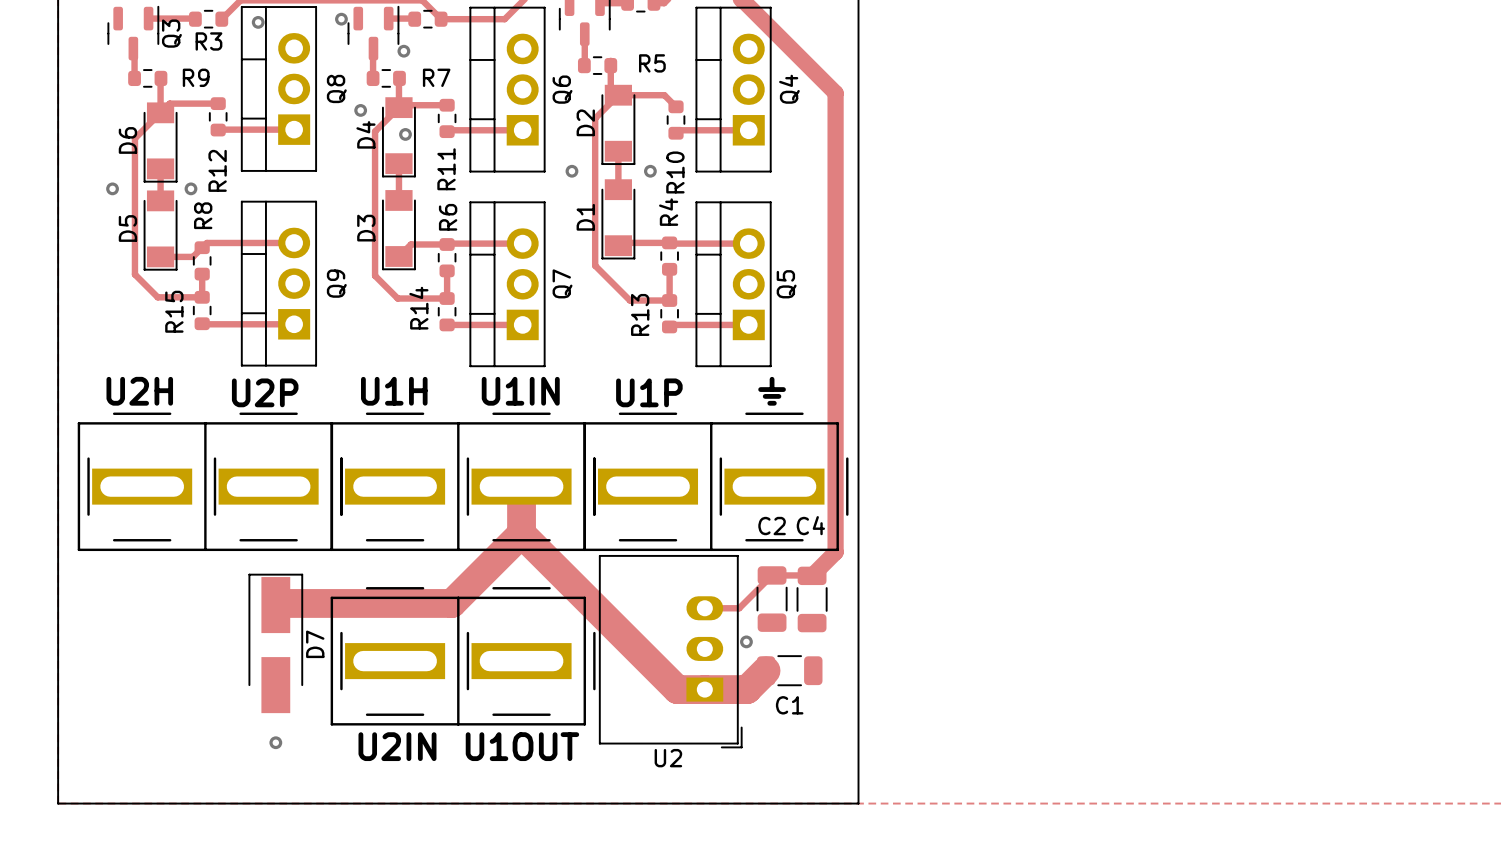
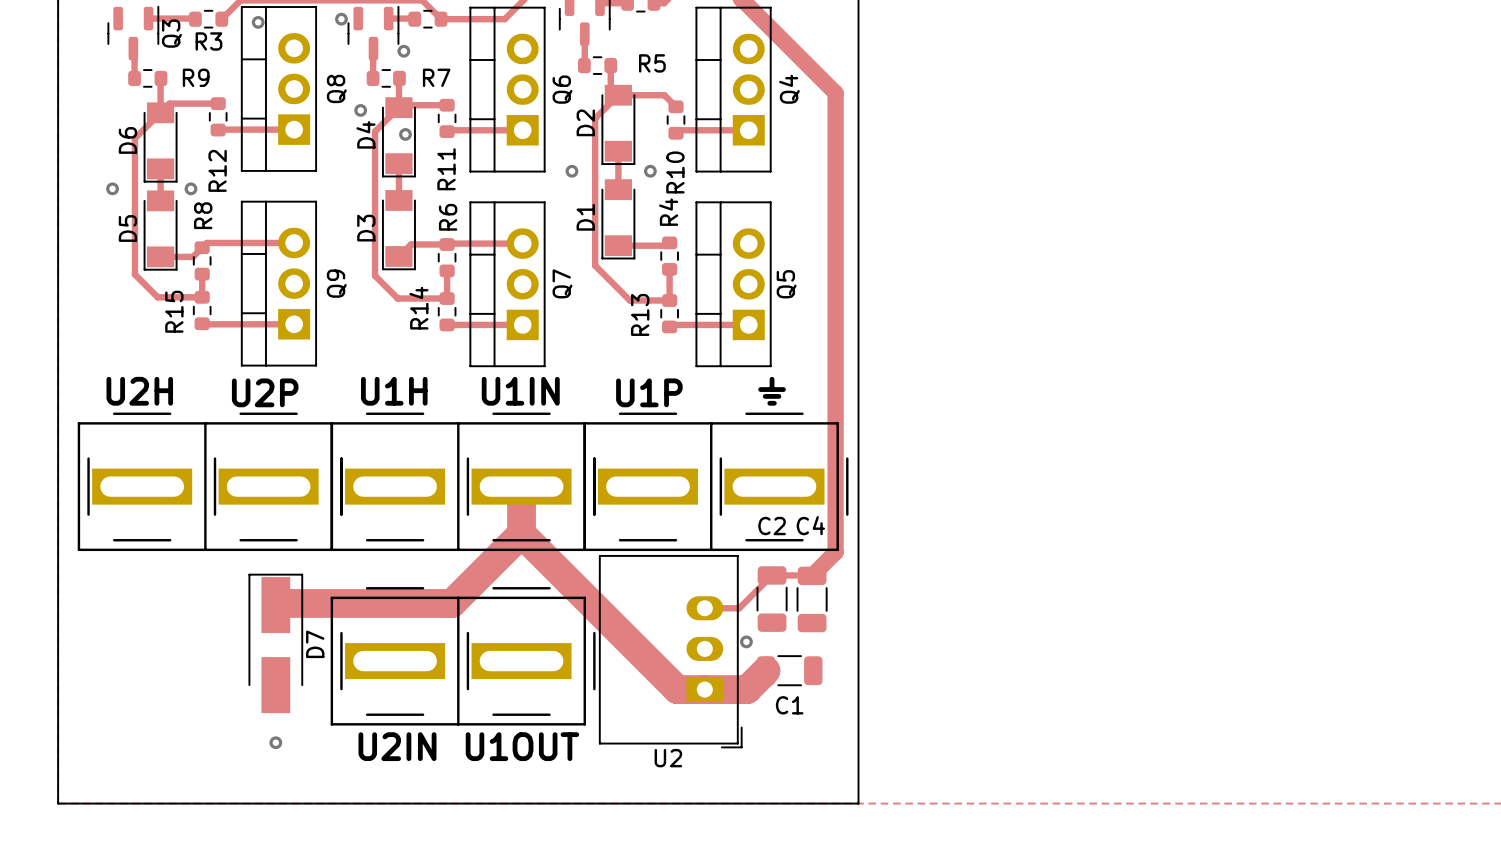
track: (748, 243) (621, 242) (618, 245) -> (669, 242) (666, 245) (618, 245)

